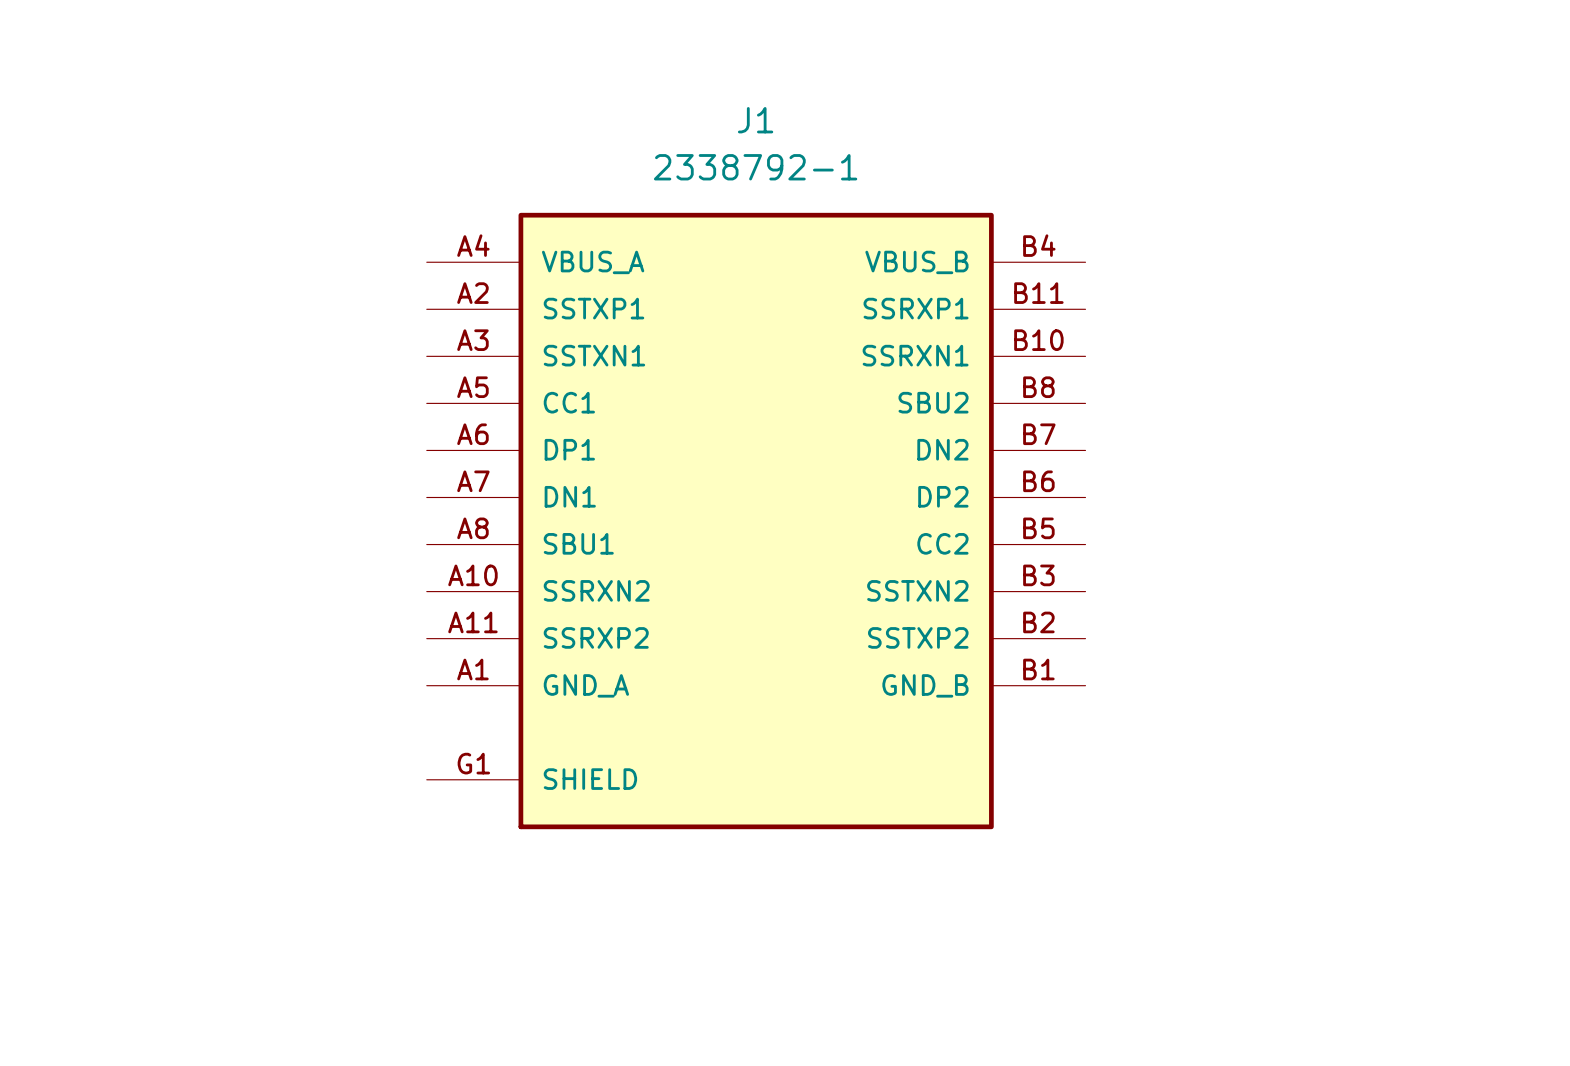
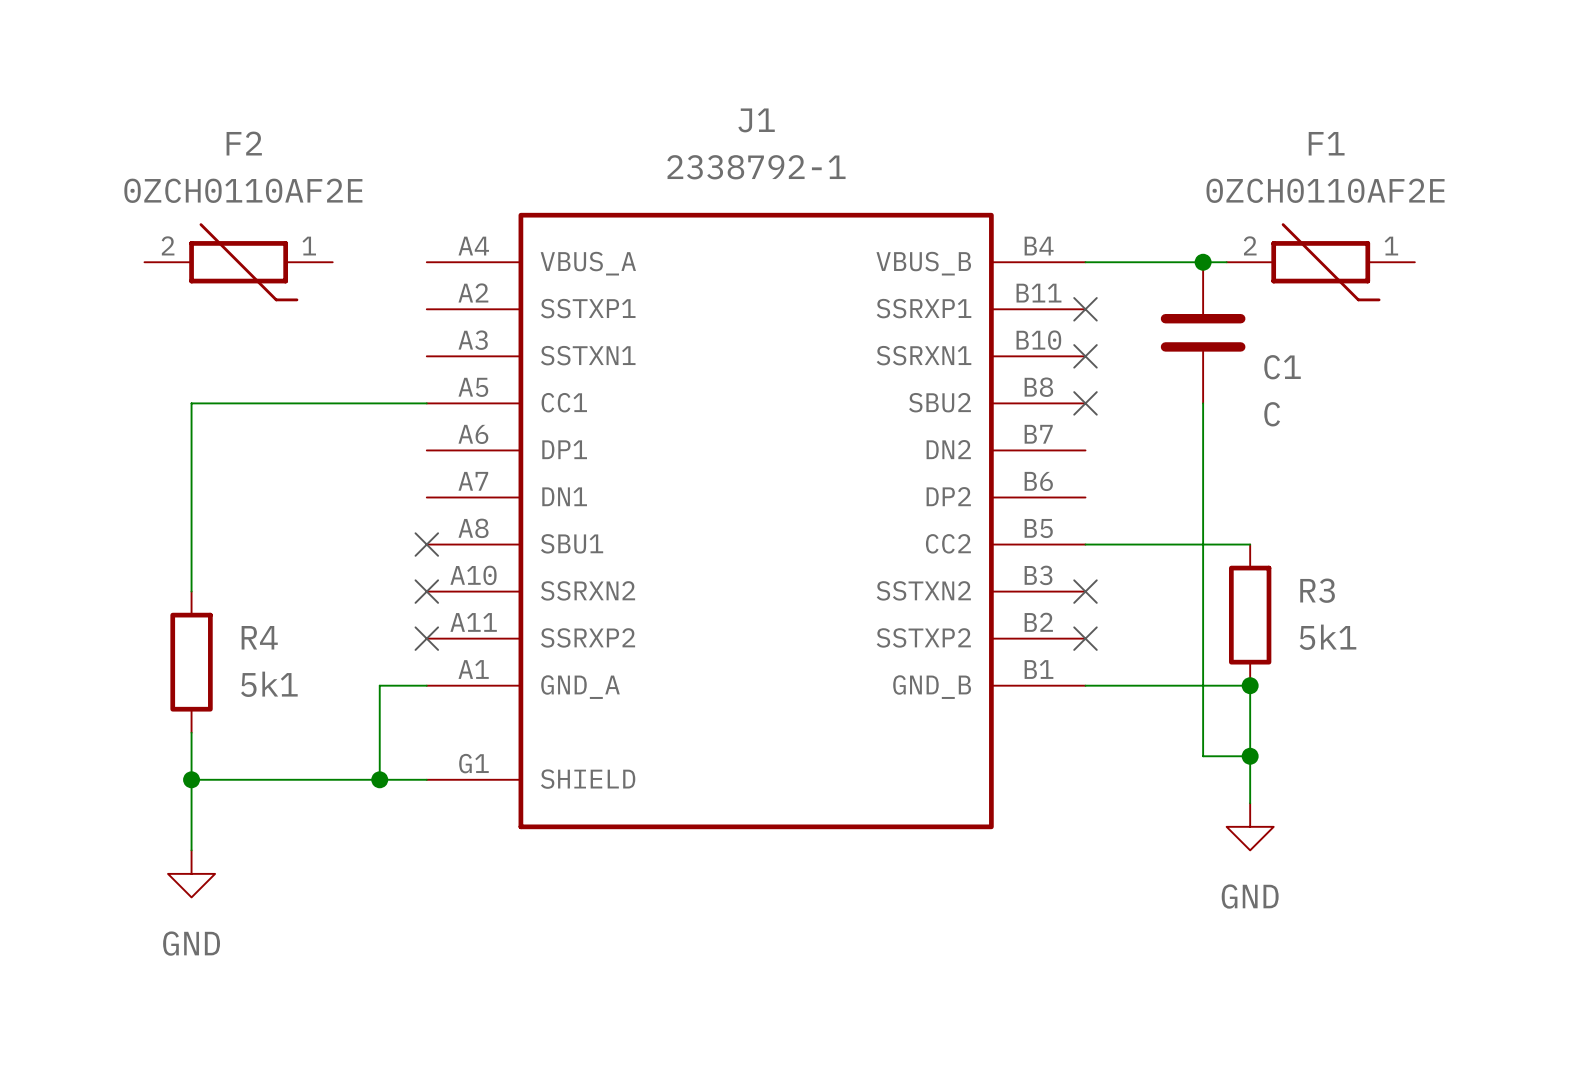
F2: none -> 0ZCH0110AF2E (238, 262)
wire: none -> (1085, 262) (1226, 262)
junction: none -> (1203, 262)
F1: none -> 0ZCH0110AF2E (1320, 262)
no-connect mark: none -> (1085, 309)
C1: none -> C (1203, 332)
no-connect mark: none -> (1085, 356)
wire: none -> (426, 403) (191, 403) (191, 591)
no-connect mark: none -> (1085, 403)
wire: none -> (1203, 403) (1203, 756) (1250, 756)
no-connect mark: none -> (426, 544)
wire: none -> (1085, 544) (1250, 544)
no-connect mark: none -> (426, 591)
no-connect mark: none -> (1085, 591)
R3: none -> 5k1 (1250, 615)
no-connect mark: none -> (426, 638)
no-connect mark: none -> (1085, 638)
R4: none -> 5k1 (191, 662)
wire: none -> (426, 685) (379, 685) (379, 779)
wire: none -> (1085, 685) (1250, 685) (1250, 803)
junction: none -> (1250, 685)
wire: none -> (191, 732) (191, 850)
junction: none -> (1250, 756)
wire: none -> (191, 779) (426, 779)
junction: none -> (191, 779)
junction: none -> (379, 779)
power symbol: none -> GND (1250, 826)
power symbol: none -> GND (191, 873)

